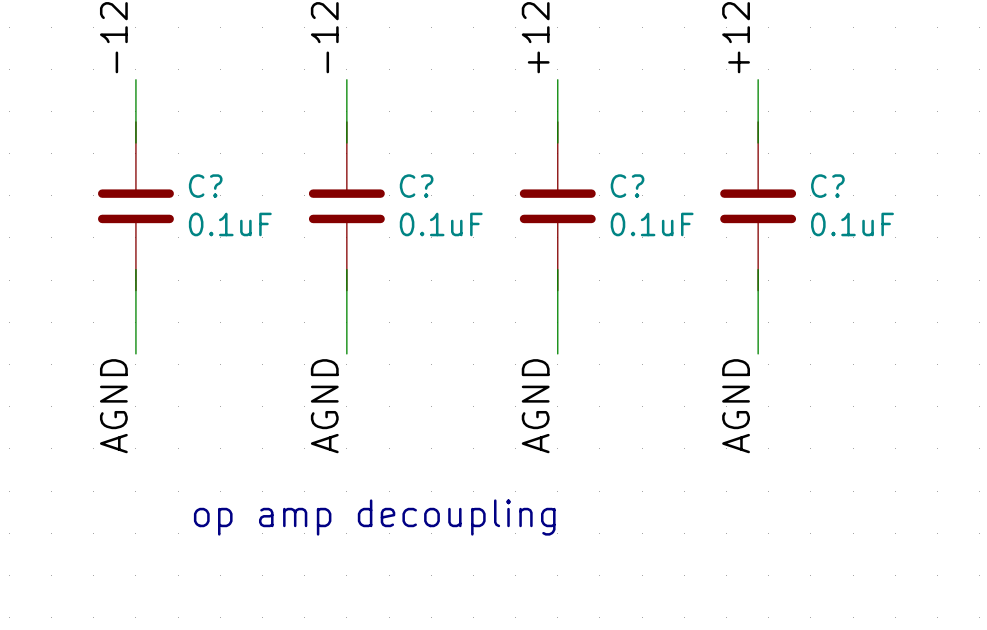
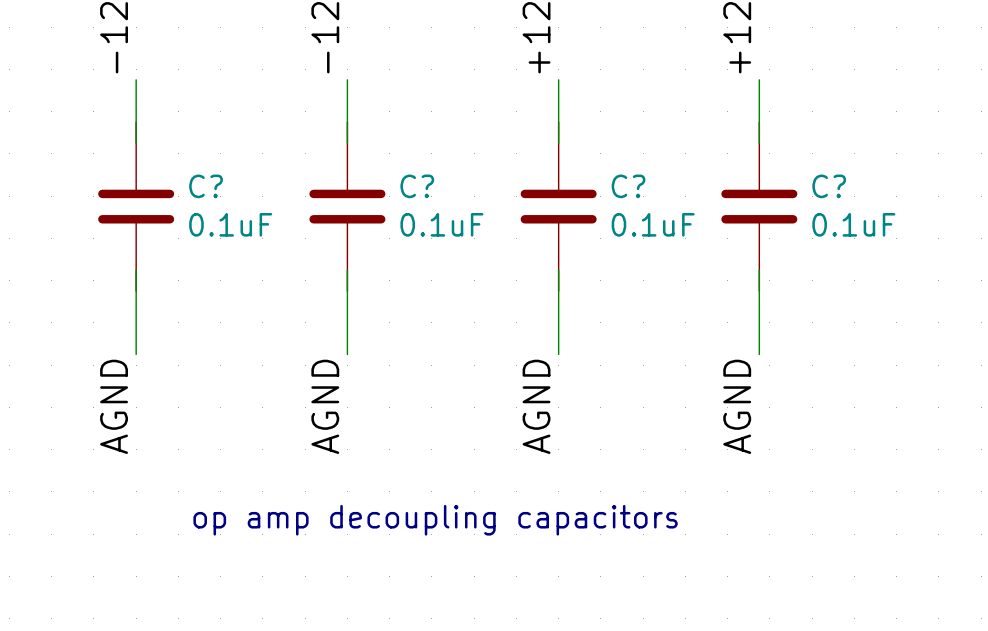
text: op amp decoupling (374, 517) -> op amp decoupling capacitors (435, 520)

